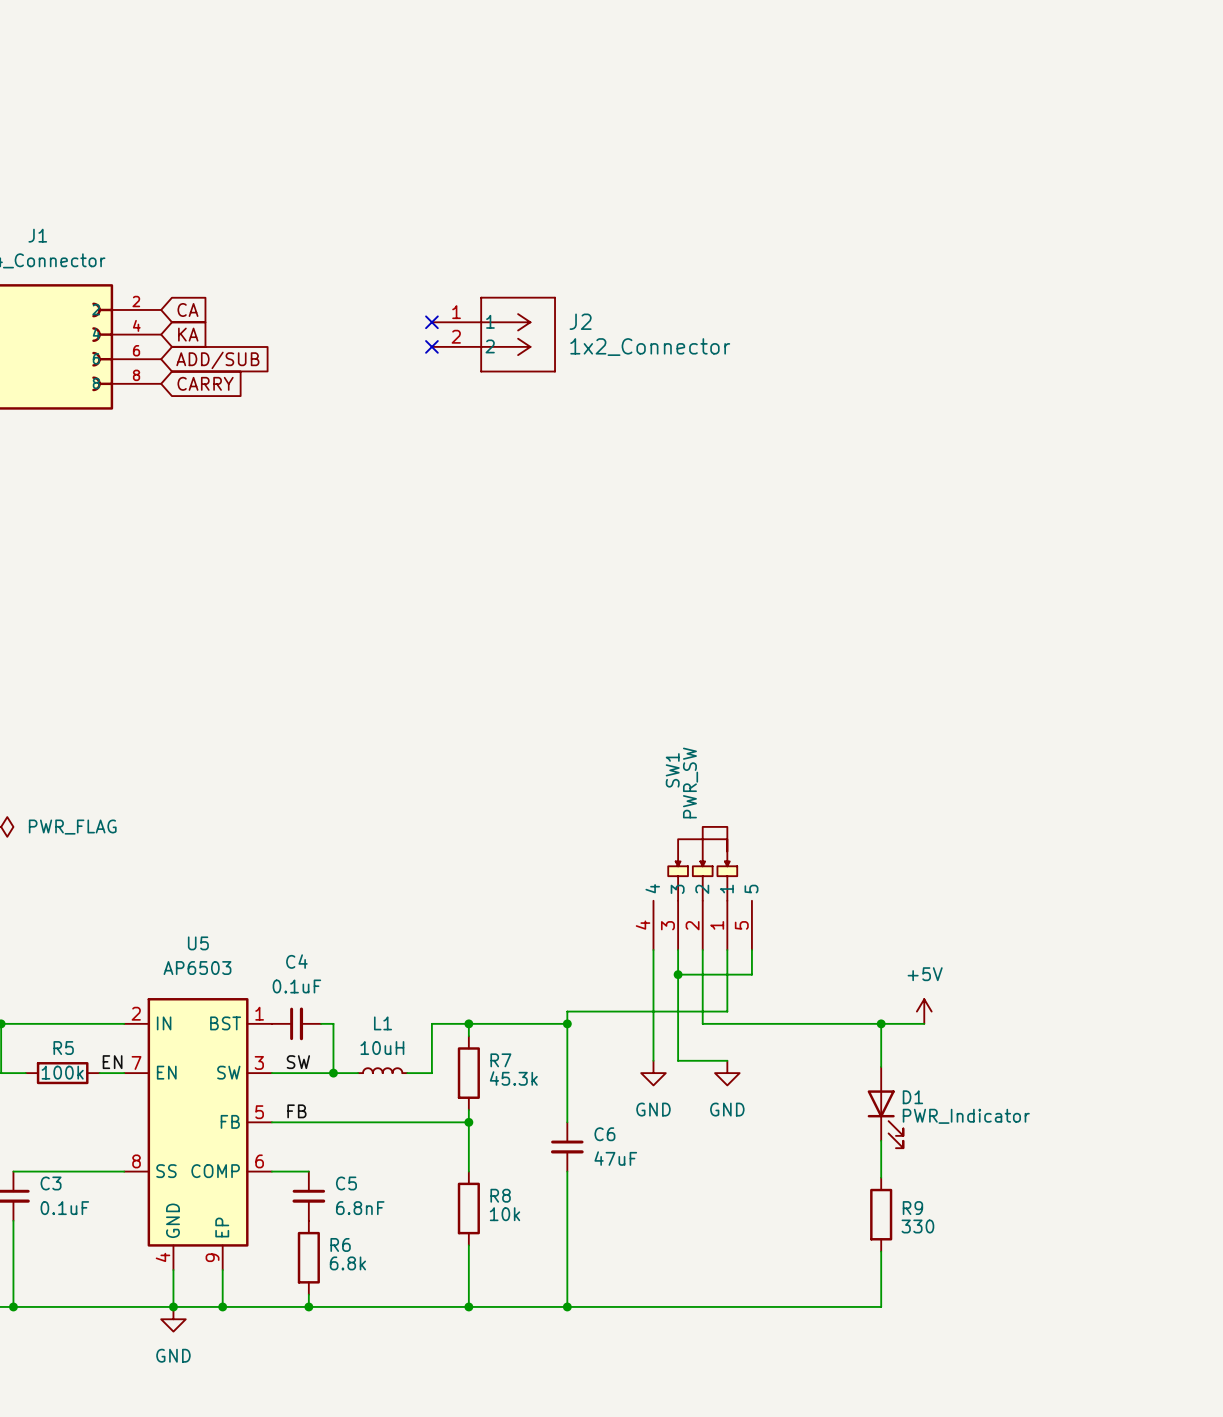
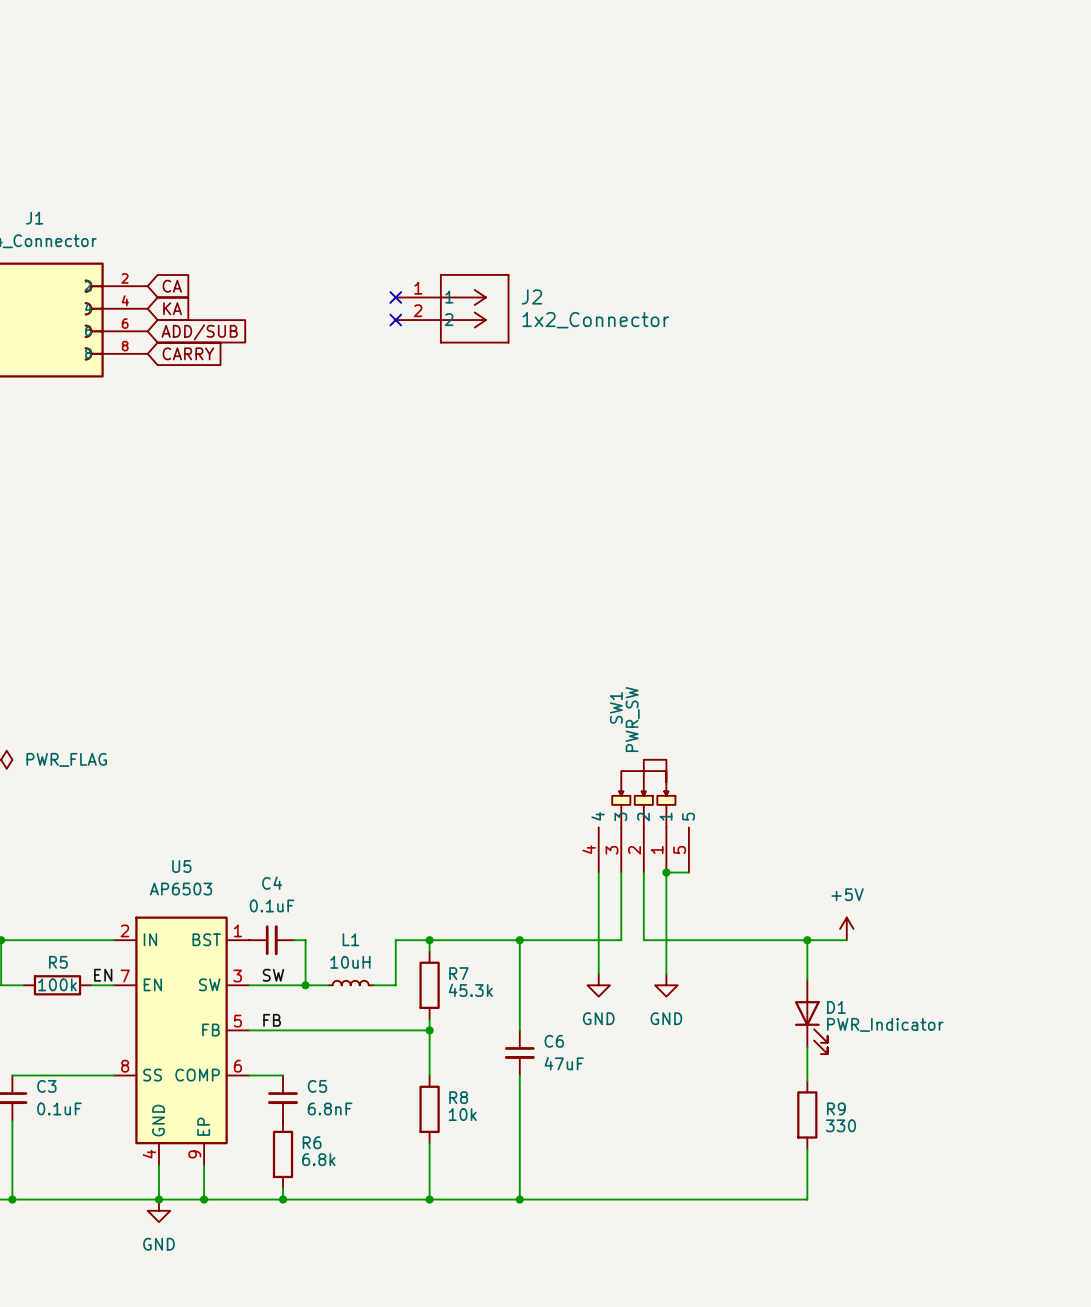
wire: (751, 950) (751, 974) (678, 974) -> (688, 872) (666, 872)
junction position: (678, 974) -> (666, 872)
wire: (727, 1011) (567, 1011) (567, 1023) -> (621, 940) (519, 940)
wire: (678, 1023) (678, 1060) (727, 1060) -> (666, 928) (666, 974)

